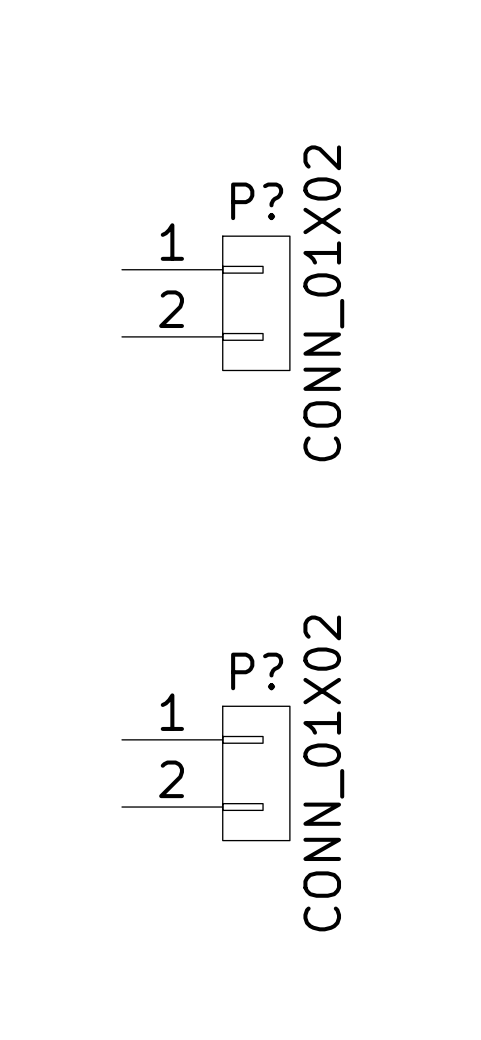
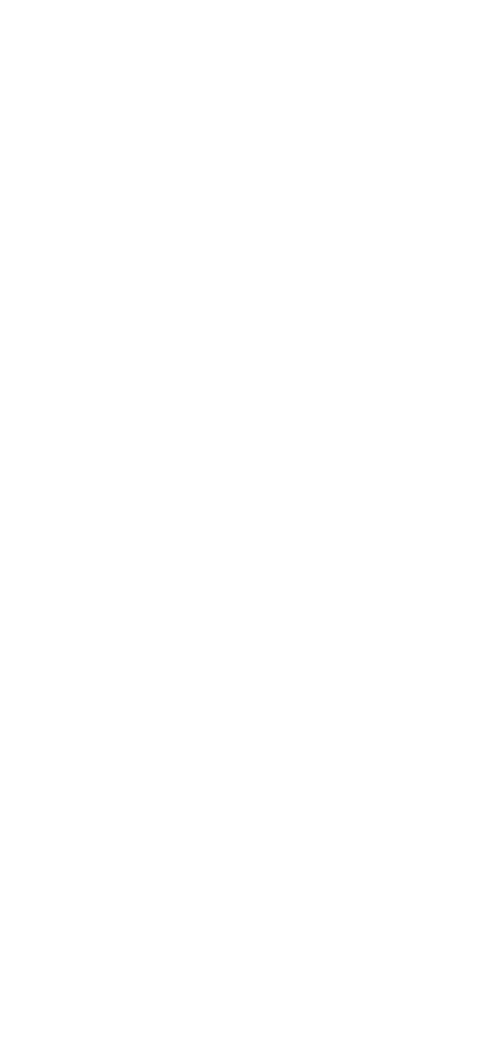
P?: CONN_01X02 (205, 303) -> none
P?: CONN_01X02 (205, 773) -> none

